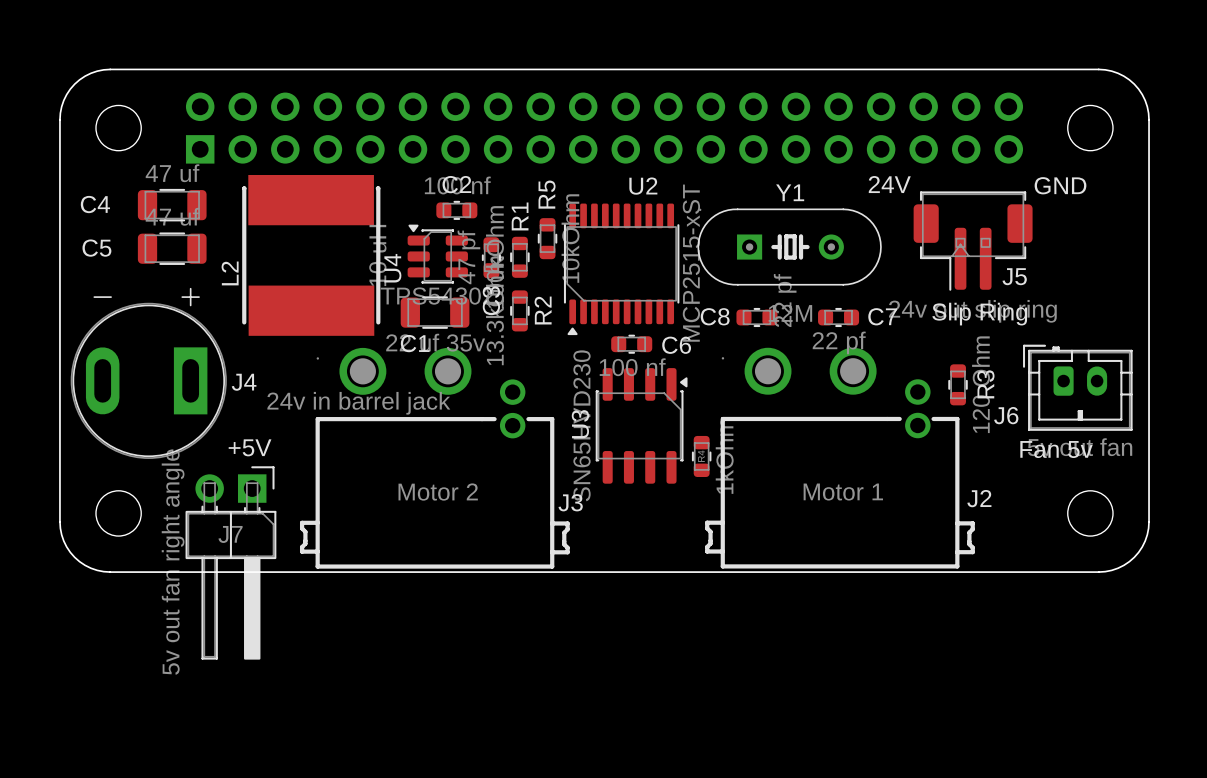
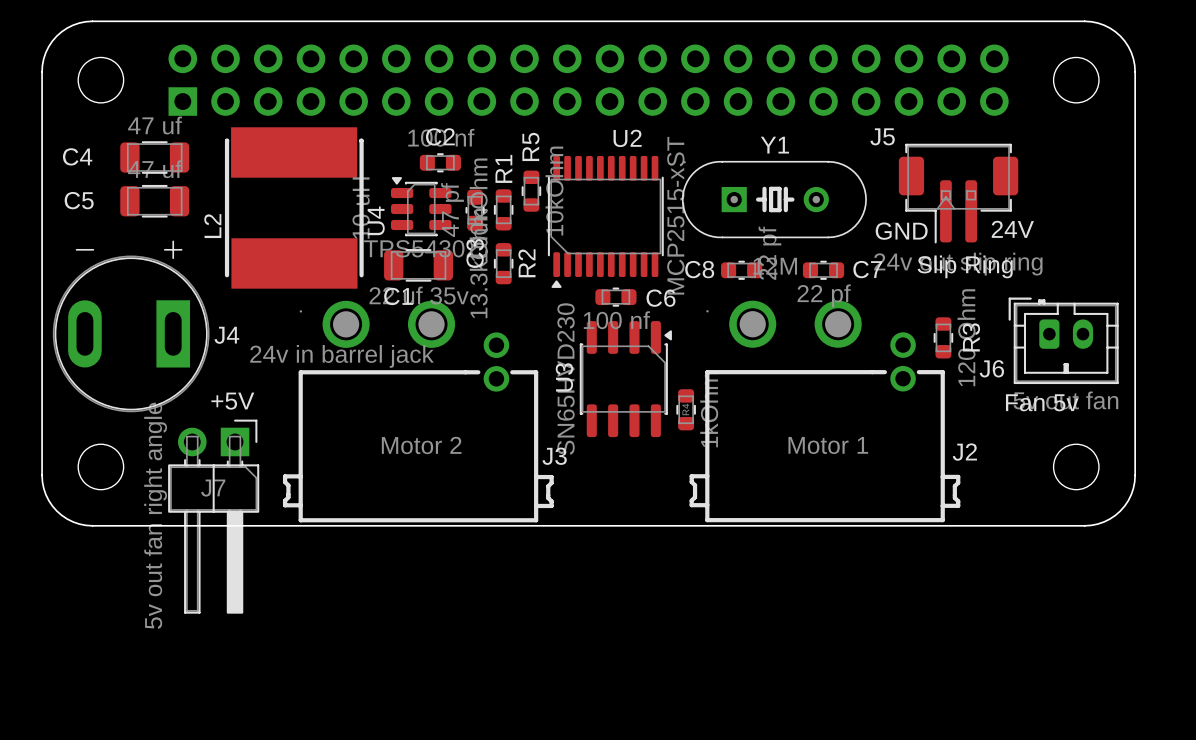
text position: 24V (889, 184) -> 24V (1012, 229)
text position: GND (1060, 185) -> GND (901, 231)
J5 name position: J5 (1014, 276) -> J5 (882, 136)

